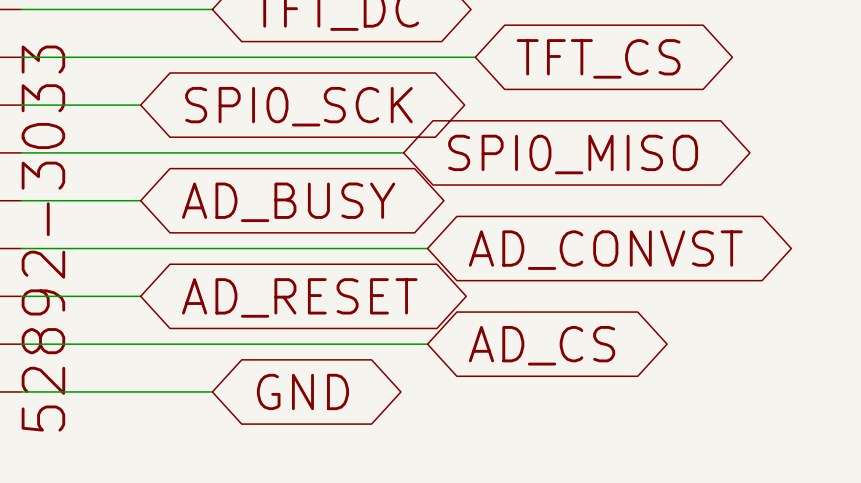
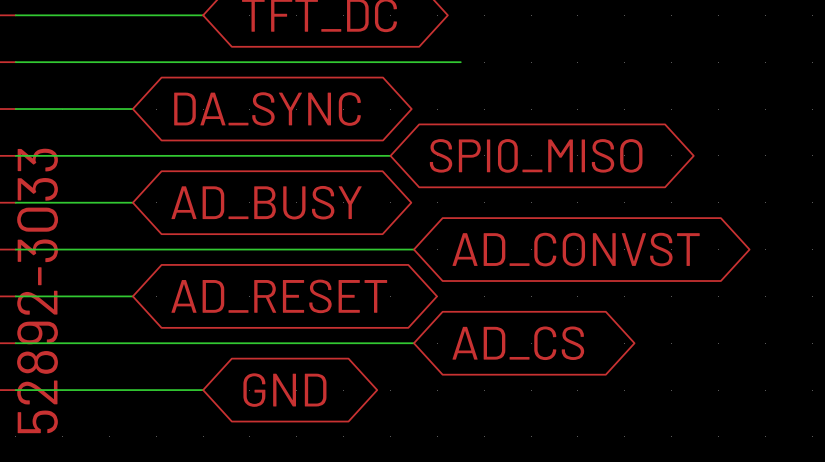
global label: TFT_CS (598, 58) -> none
global label: SPI0_SCK (298, 106) -> DA_SYNC (267, 109)

